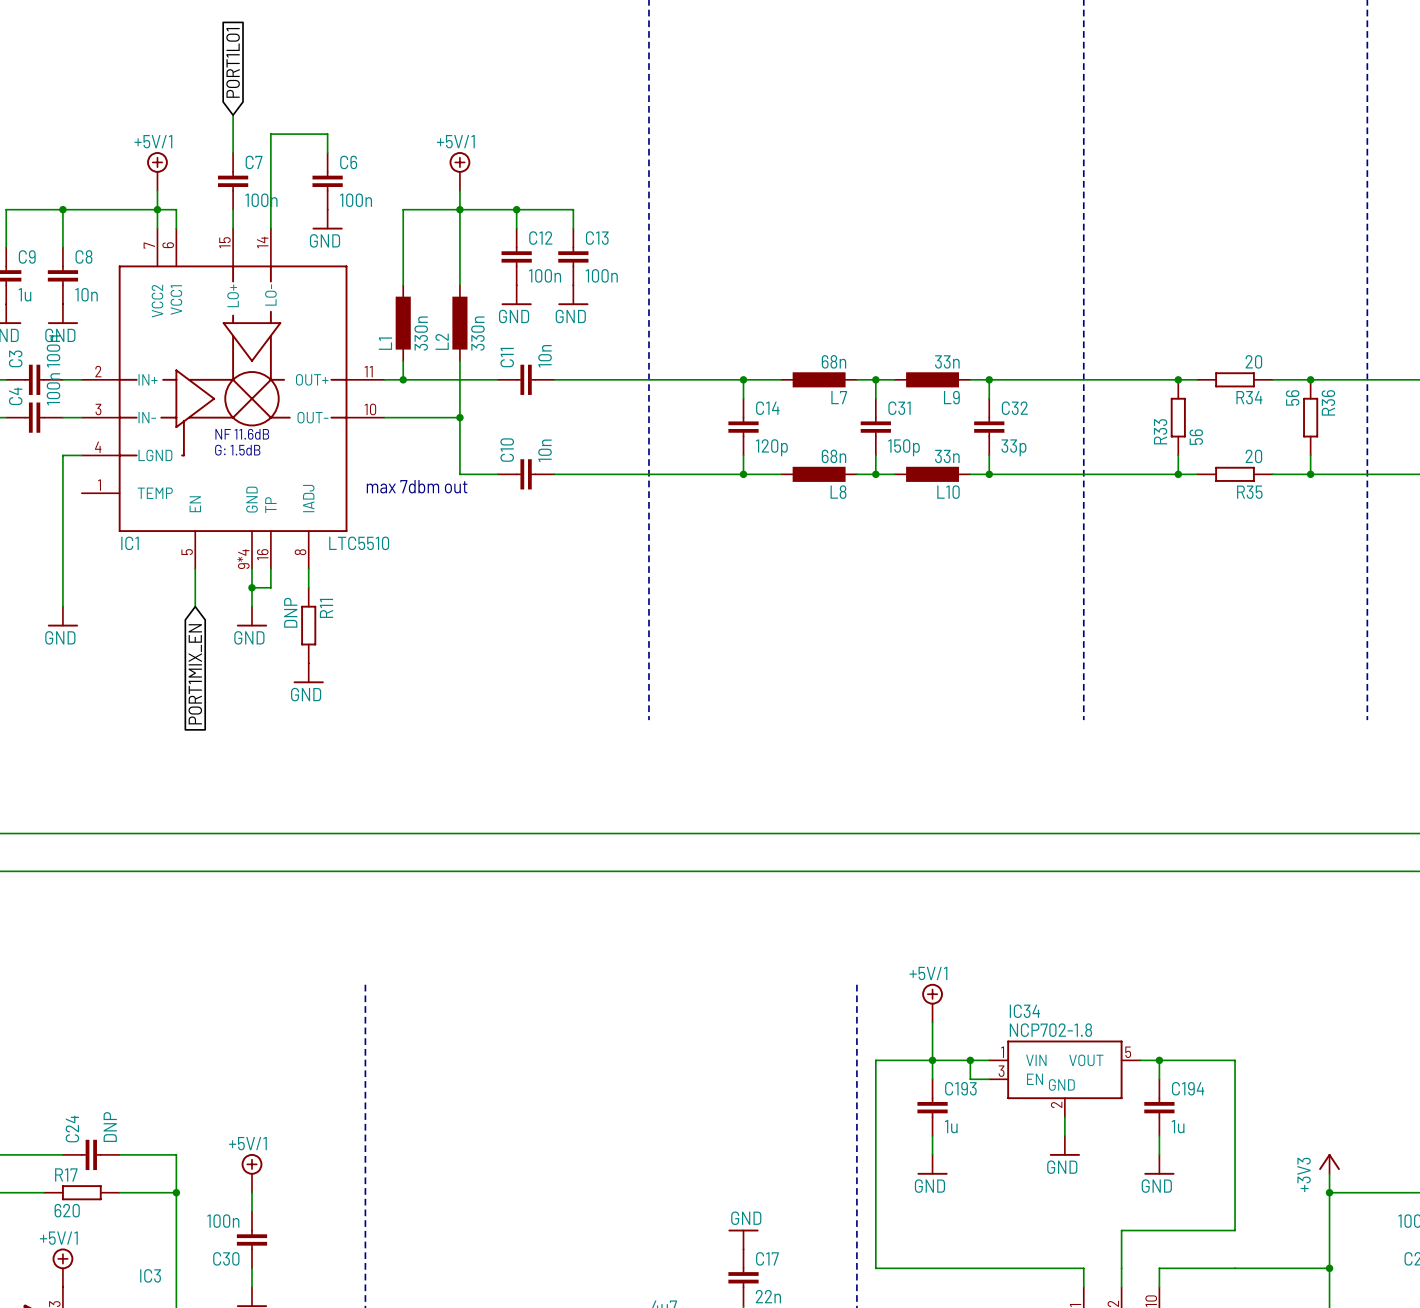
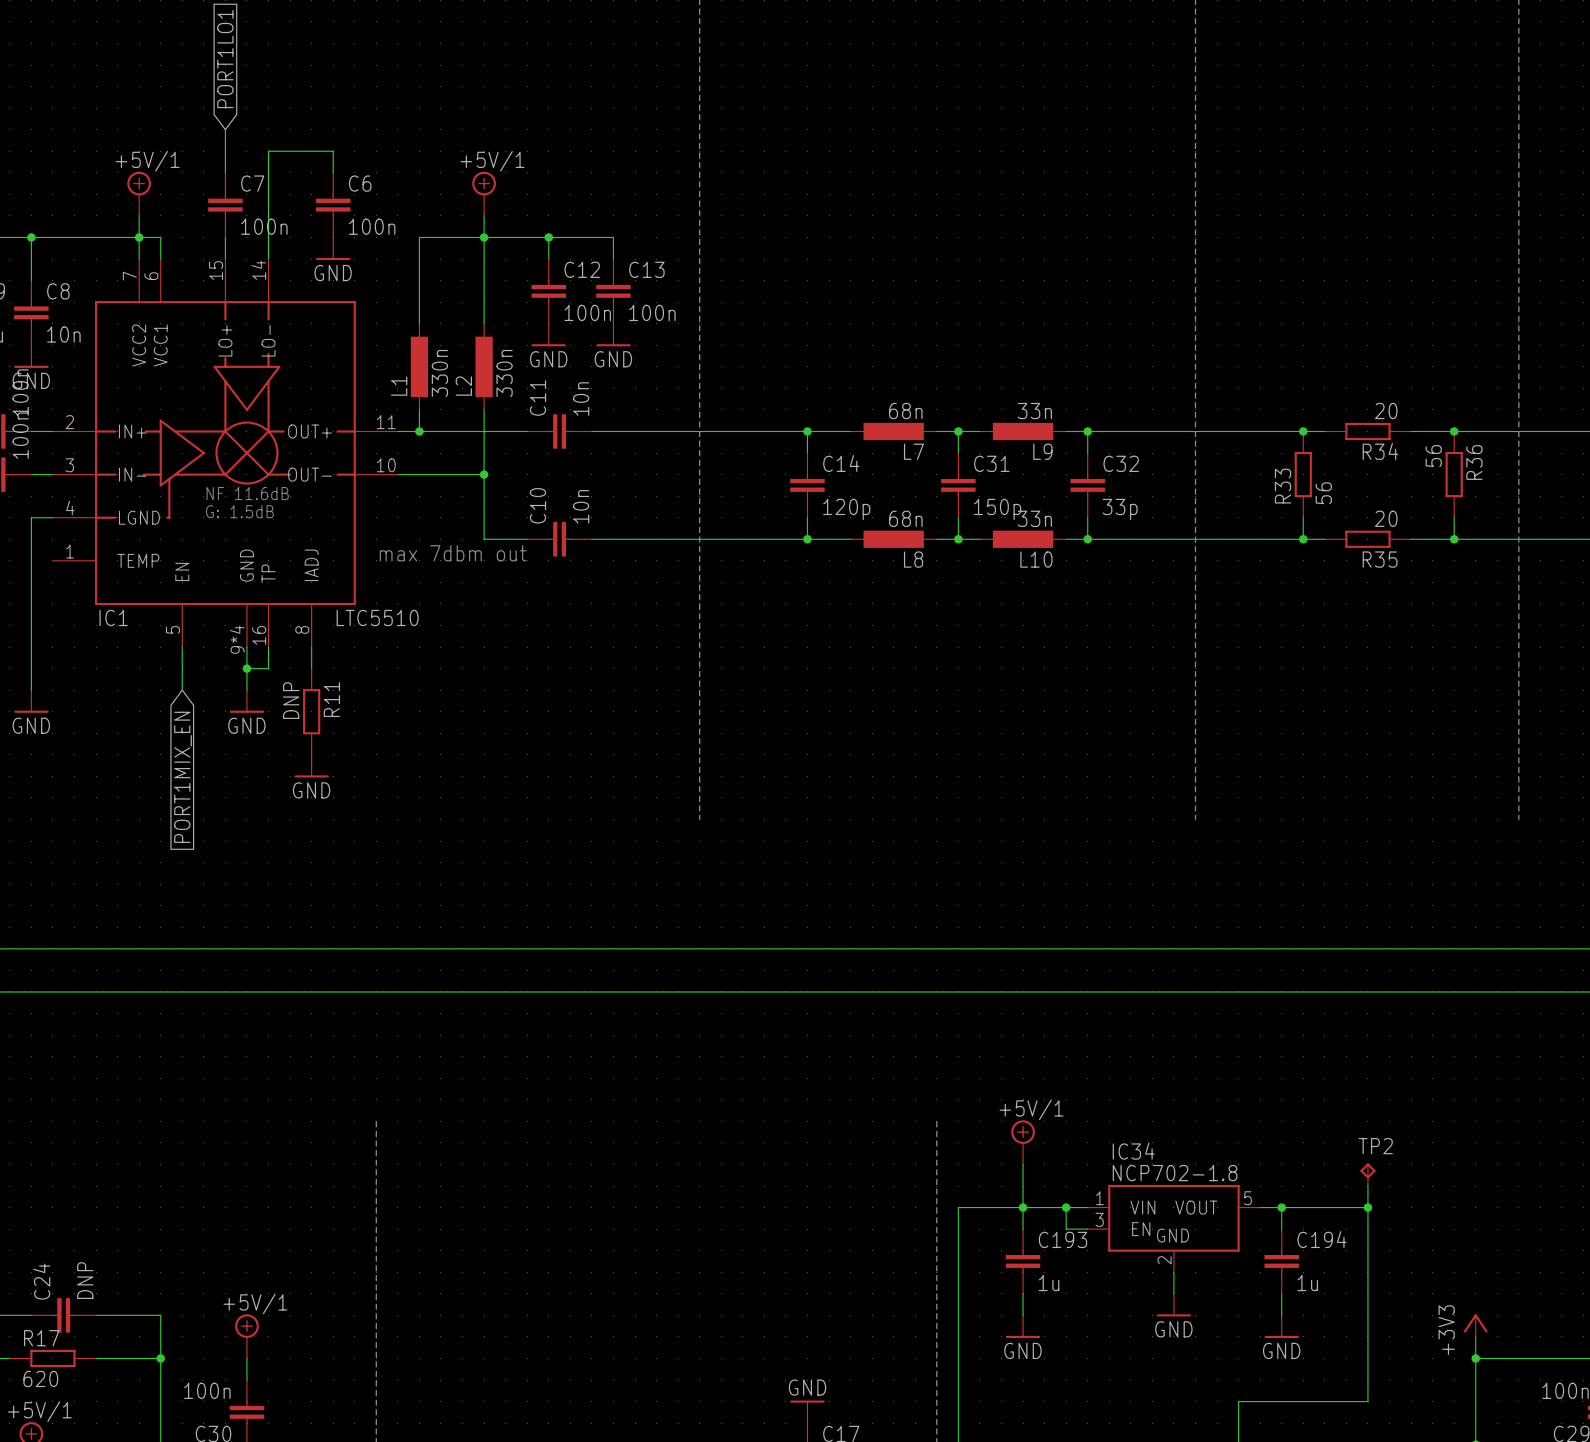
TP2: none -> (1367, 1174)
wire: none -> (1367, 1186) (1367, 1207)
junction: none -> (1367, 1207)

